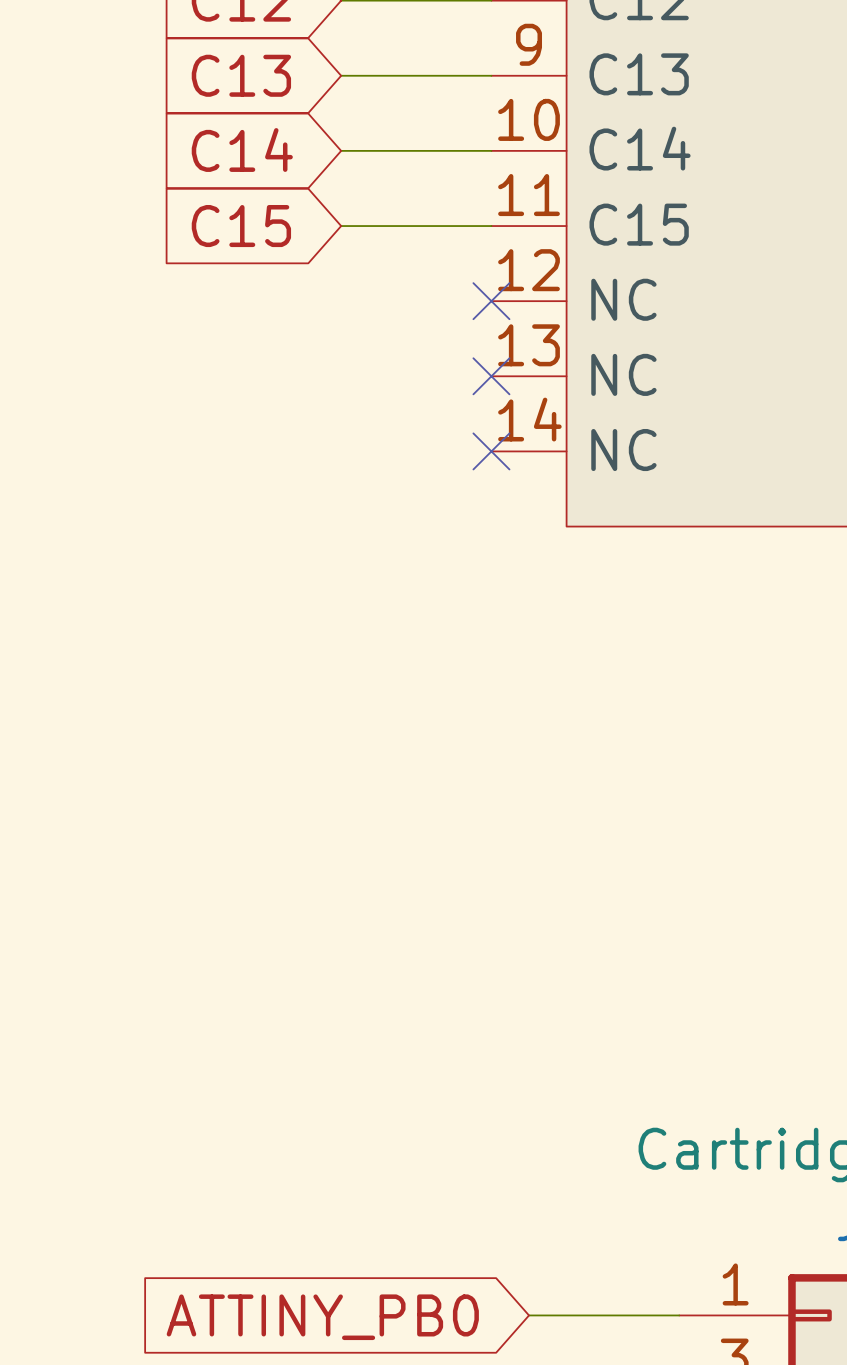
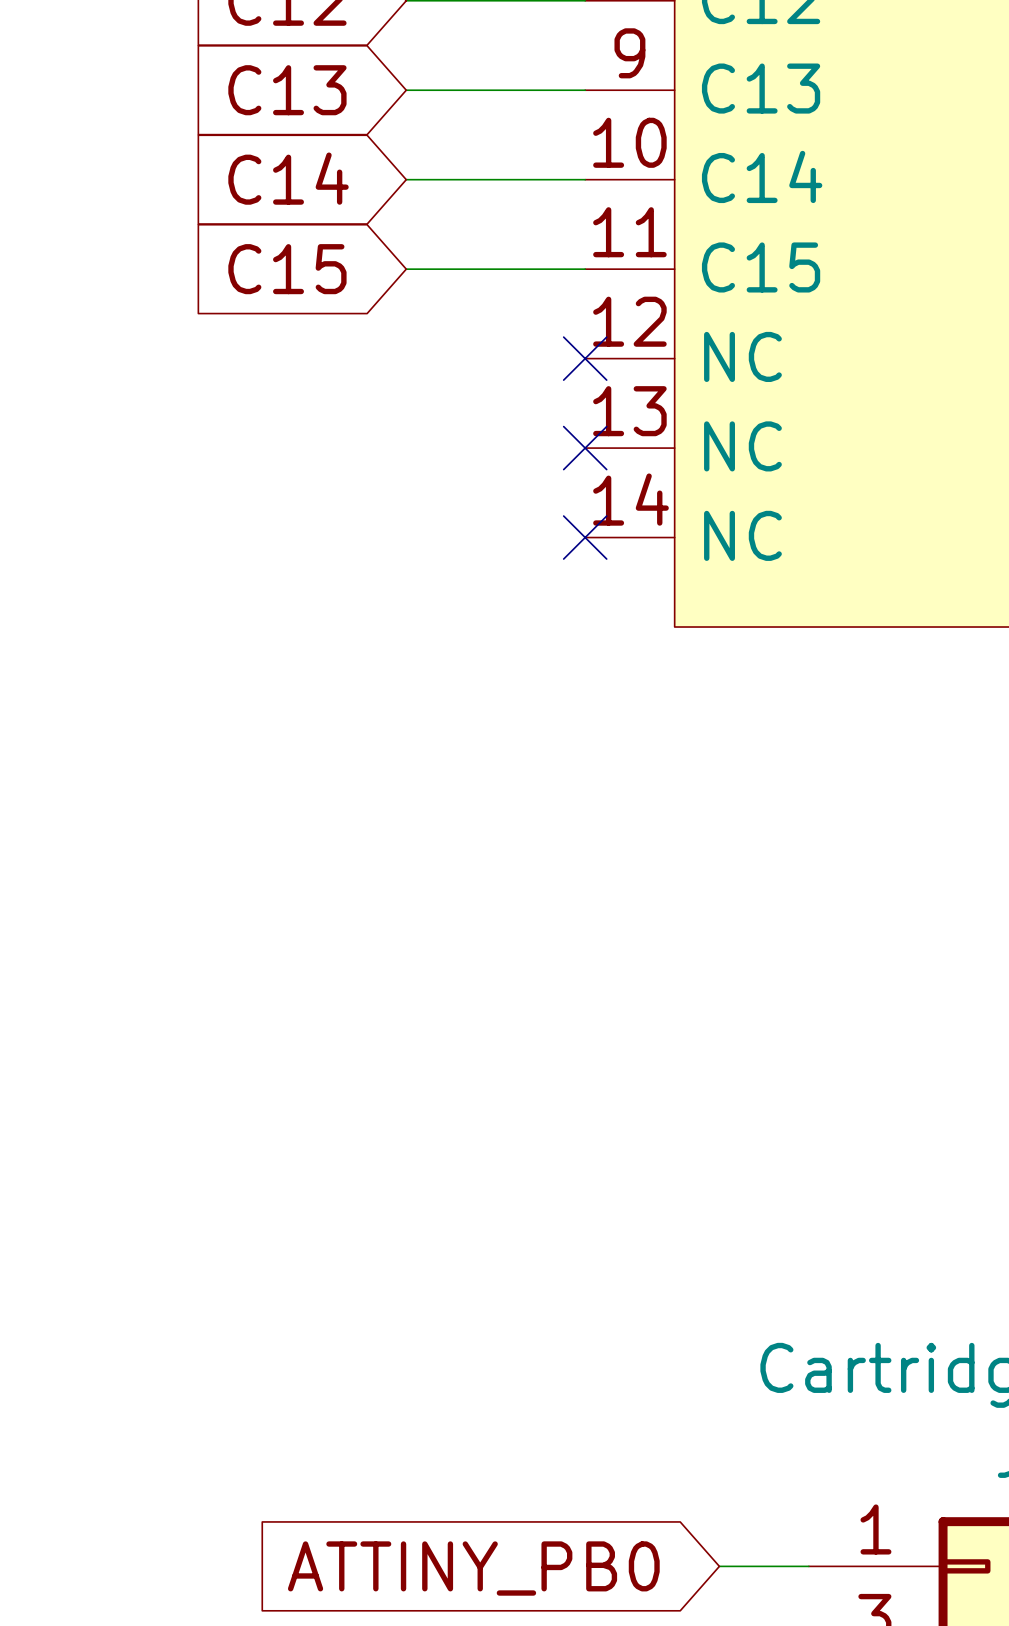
wire: (529, 1315) (604, 1315) -> none
global label position: ATTINY_PB0 (322, 1317) -> ATTINY_PB0 (473, 1568)

